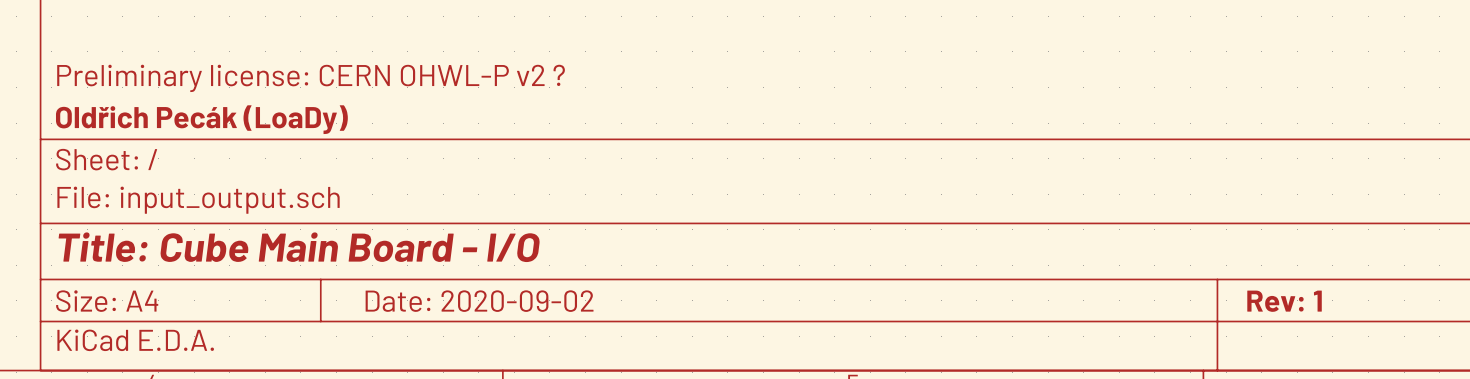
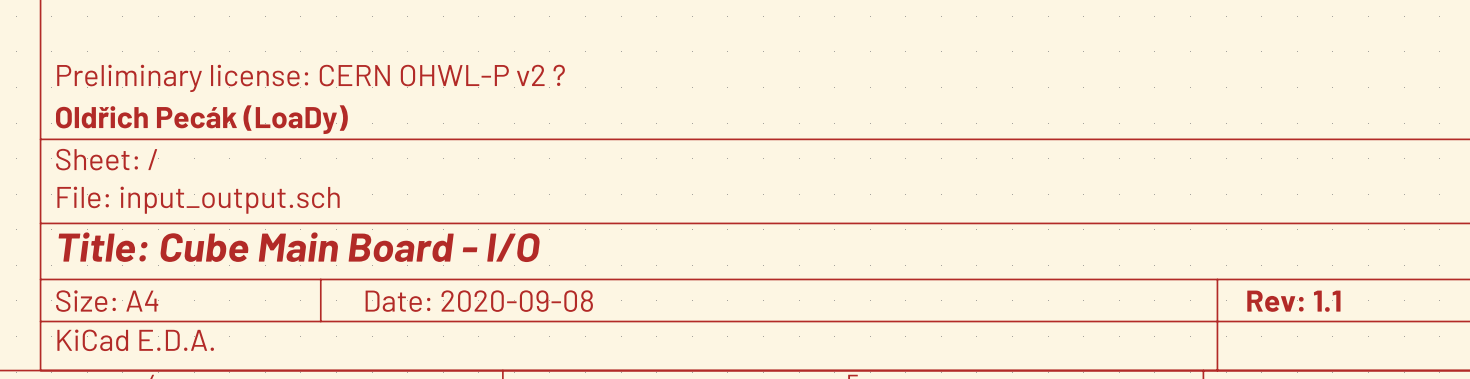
title block: Date: 2020-09-02 (479, 301) -> Date: 2020-09-08 (479, 301)
title block: Rev: 1 (1284, 301) -> Rev: 1.1 (1293, 301)

